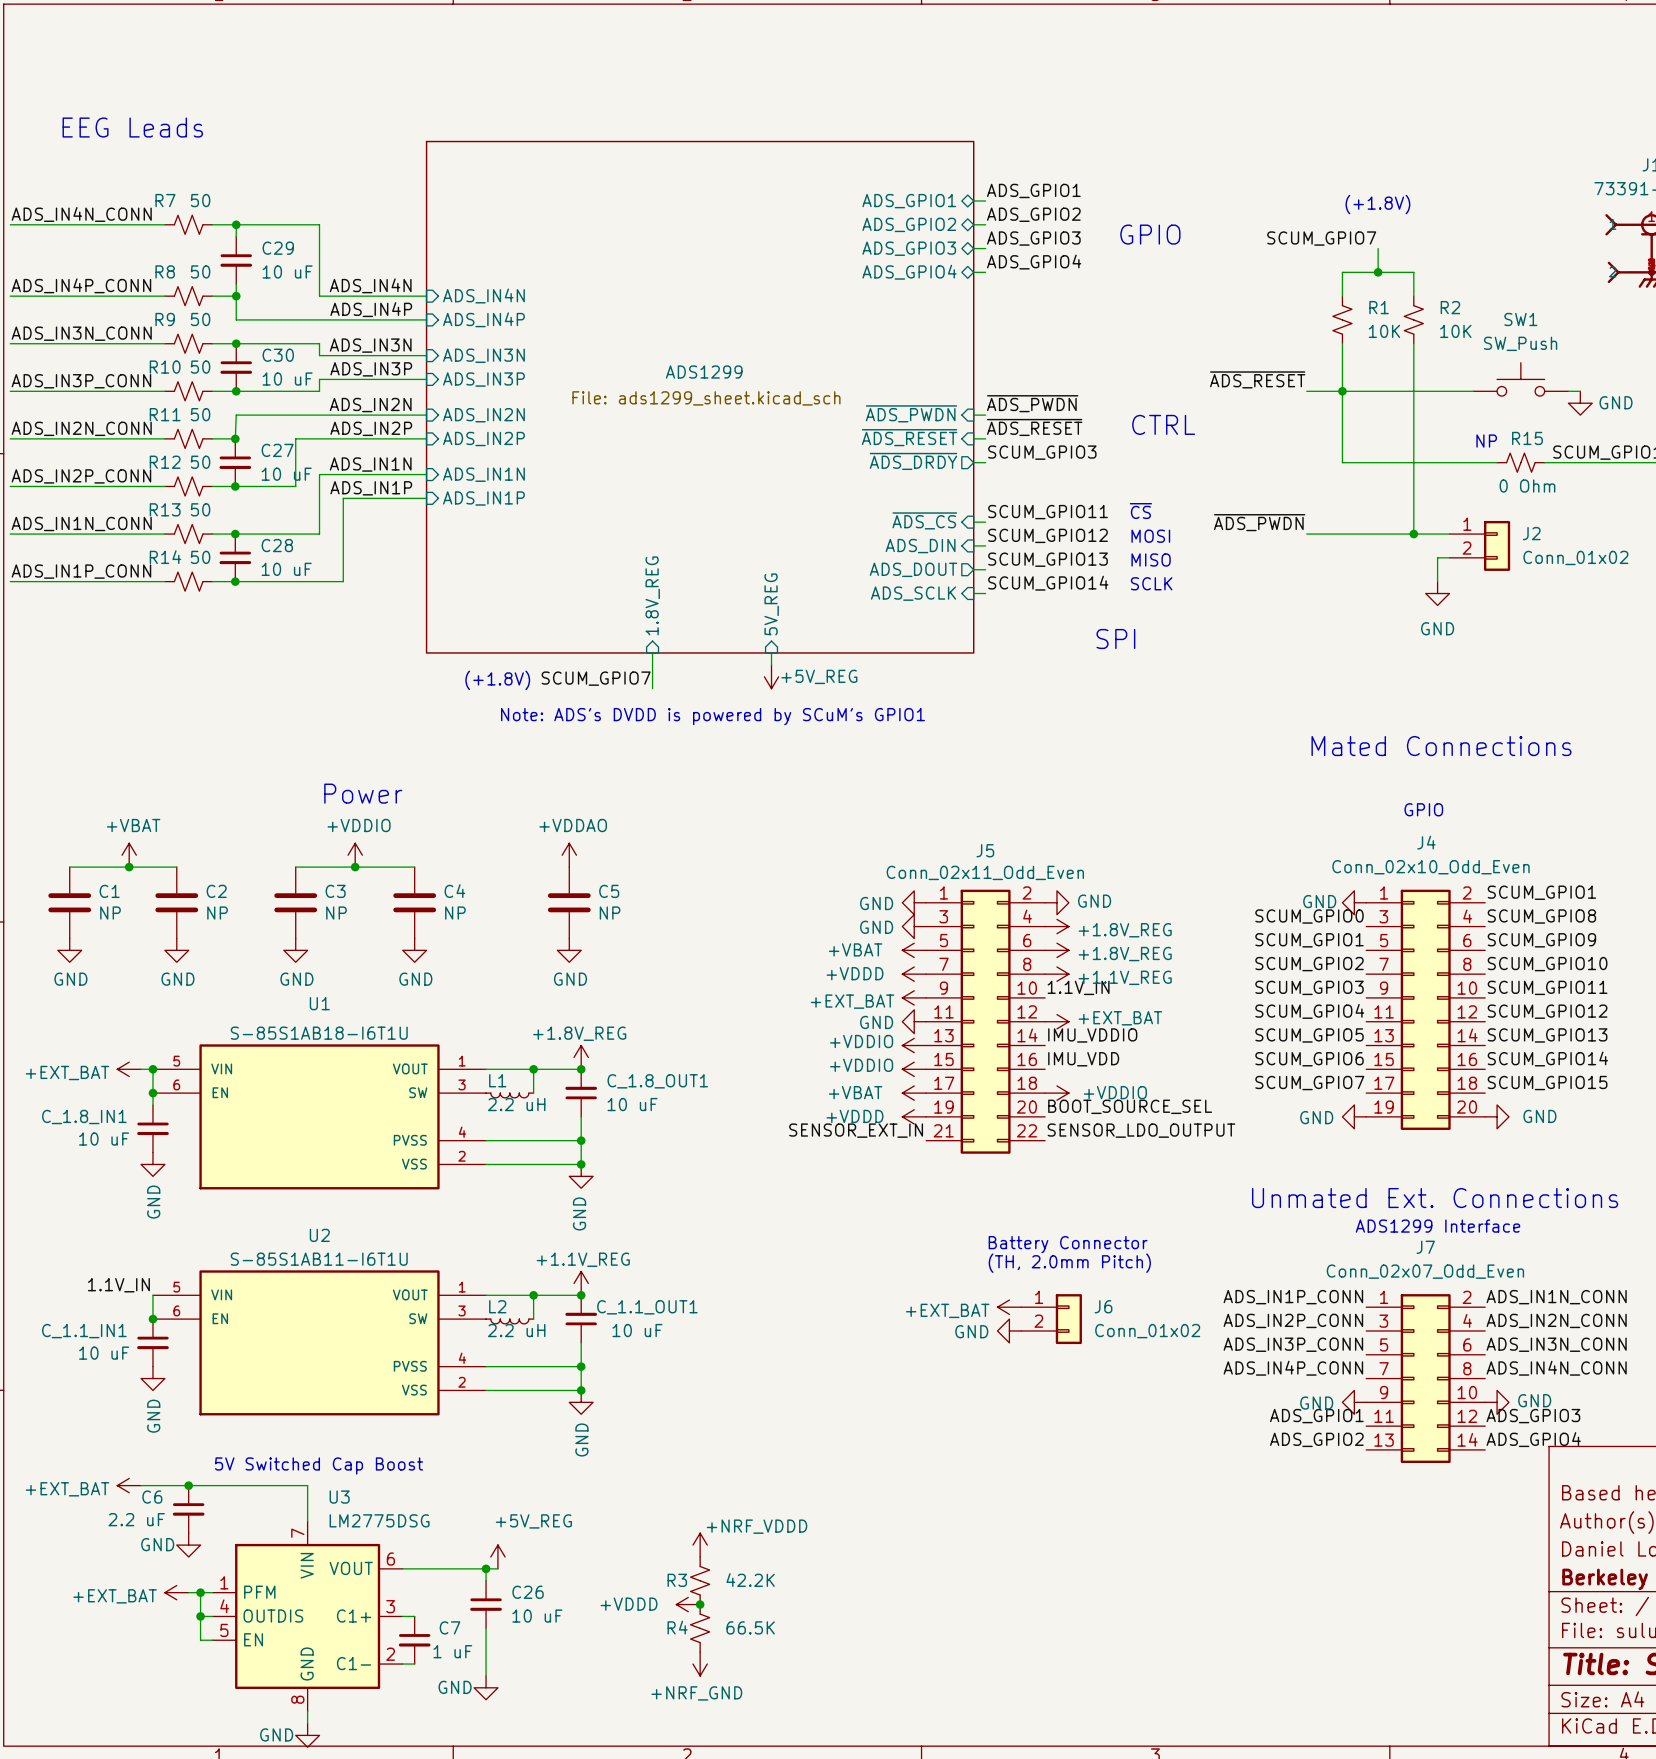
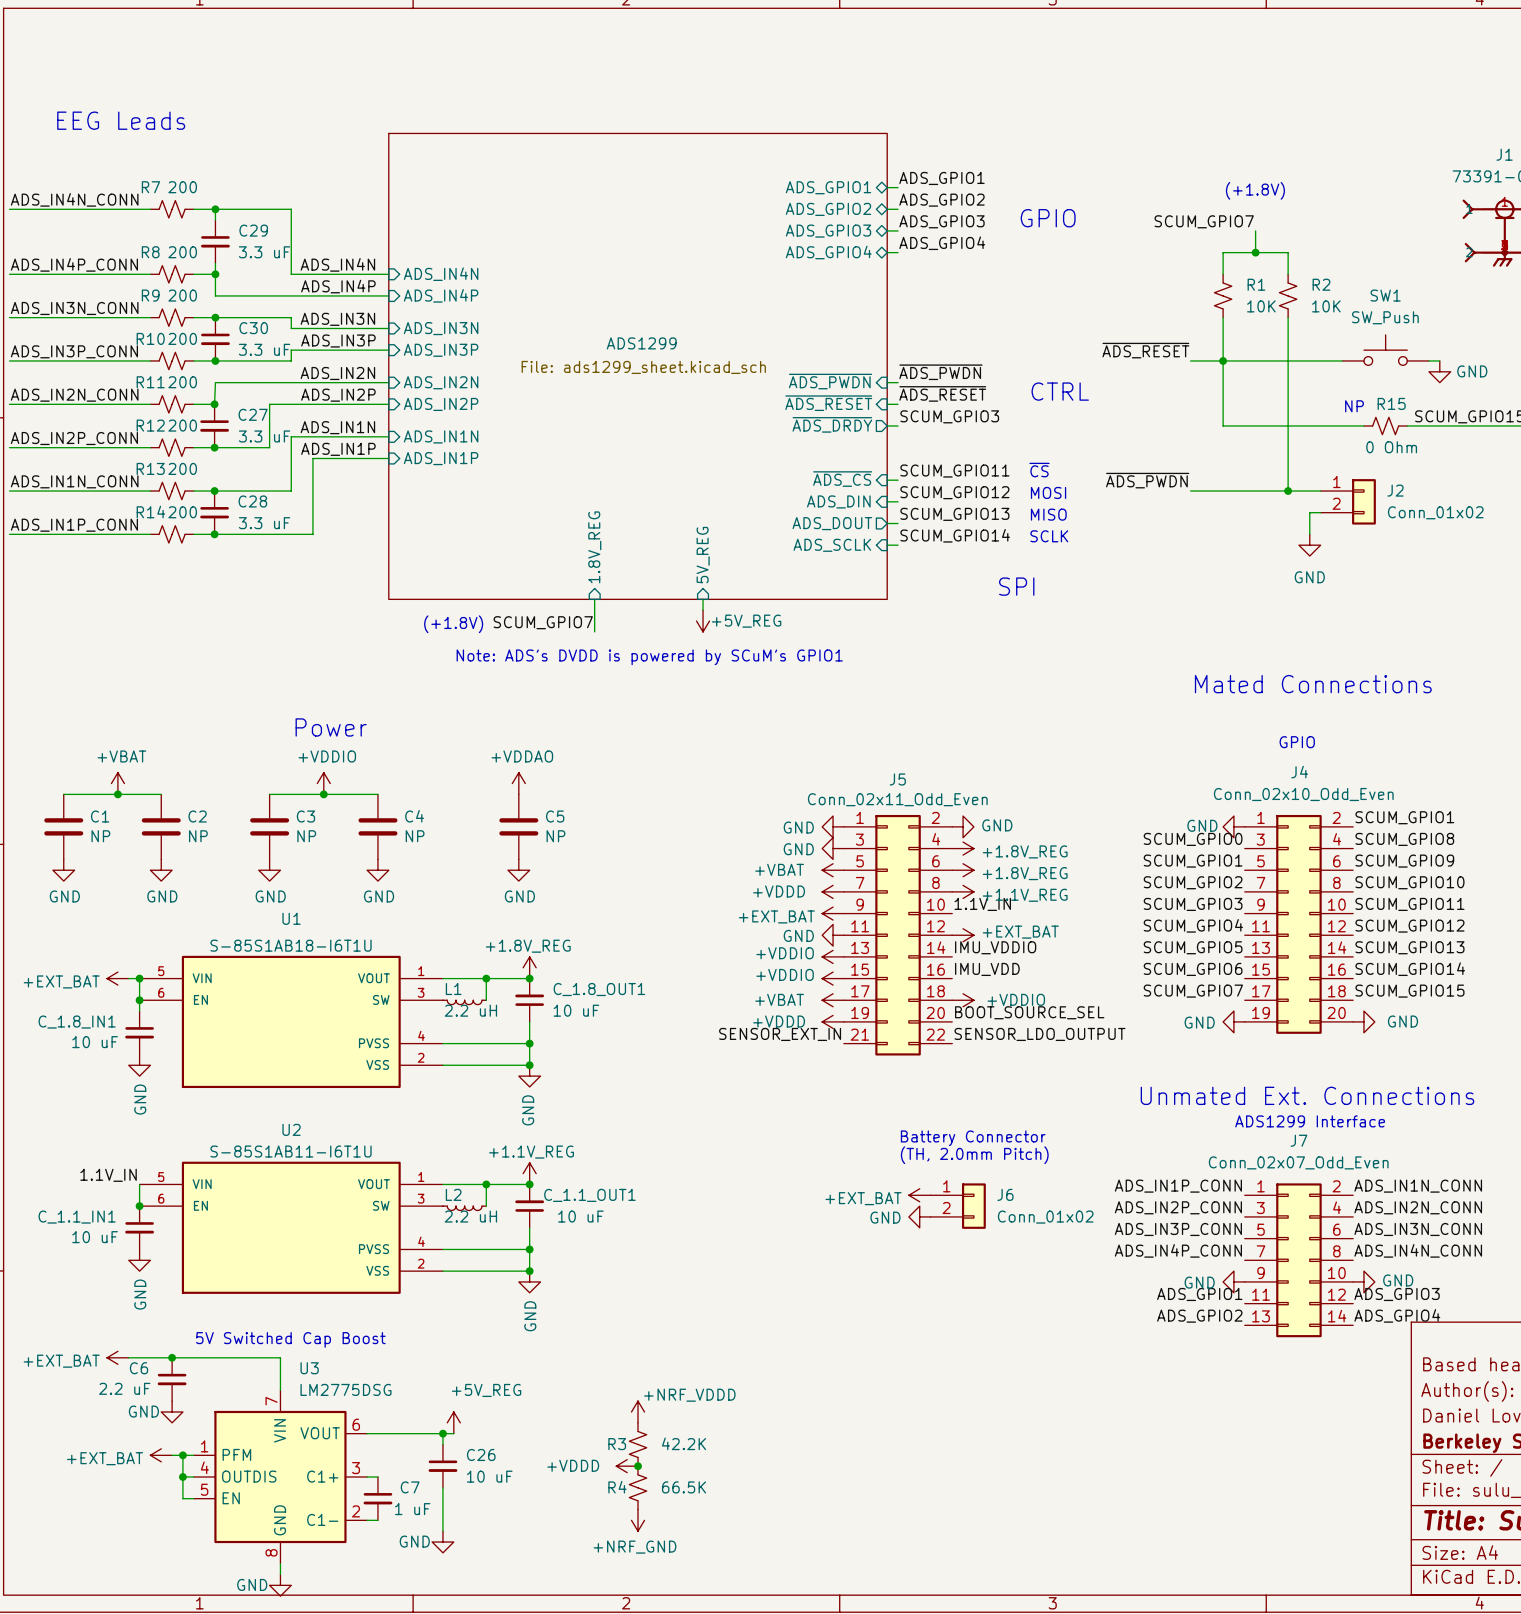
R7 value: 50 (200, 200) -> 200 (182, 187)
R8 value: 50 (200, 271) -> 200 (182, 252)
C29 value: 10 uF (287, 271) -> 3.3 uF (264, 252)
R9 value: 50 (200, 319) -> 200 (182, 295)
R10 value: 50 (200, 367) -> 200 (182, 338)
C30 value: 10 uF (287, 379) -> 3.3 uF (264, 349)
R11 value: 50 (200, 414) -> 200 (182, 382)
R12 value: 50 (200, 462) -> 200 (182, 425)
C27 value: 10 uF (286, 474) -> 3.3 uF (264, 436)
R13 value: 50 (200, 509) -> 200 (182, 468)
R14 value: 50 (200, 557) -> 200 (182, 512)
C28 value: 10 uF (286, 569) -> 3.3 uF (264, 523)

